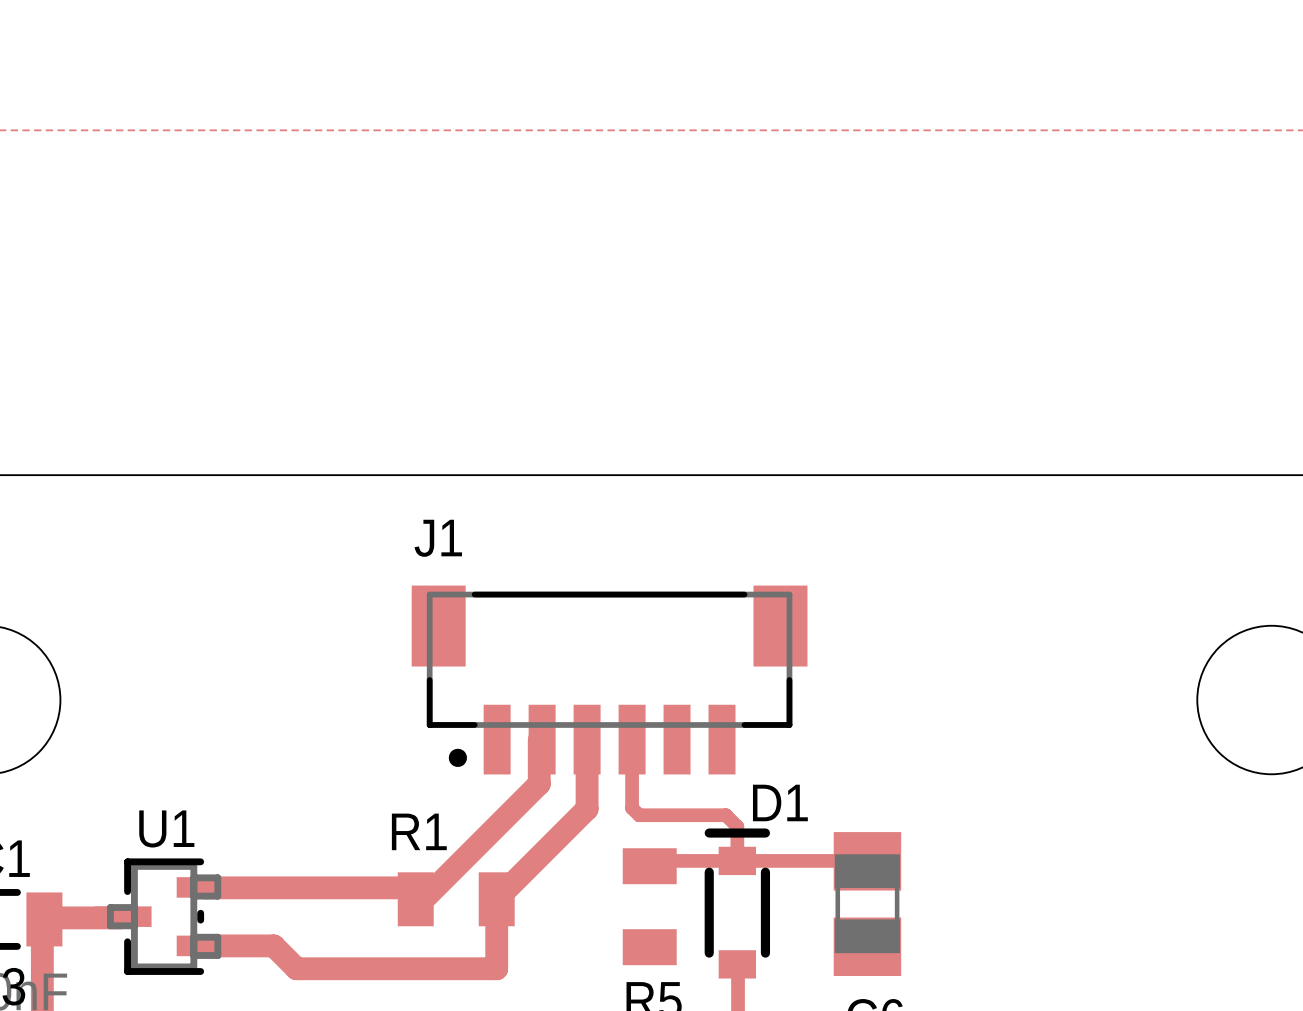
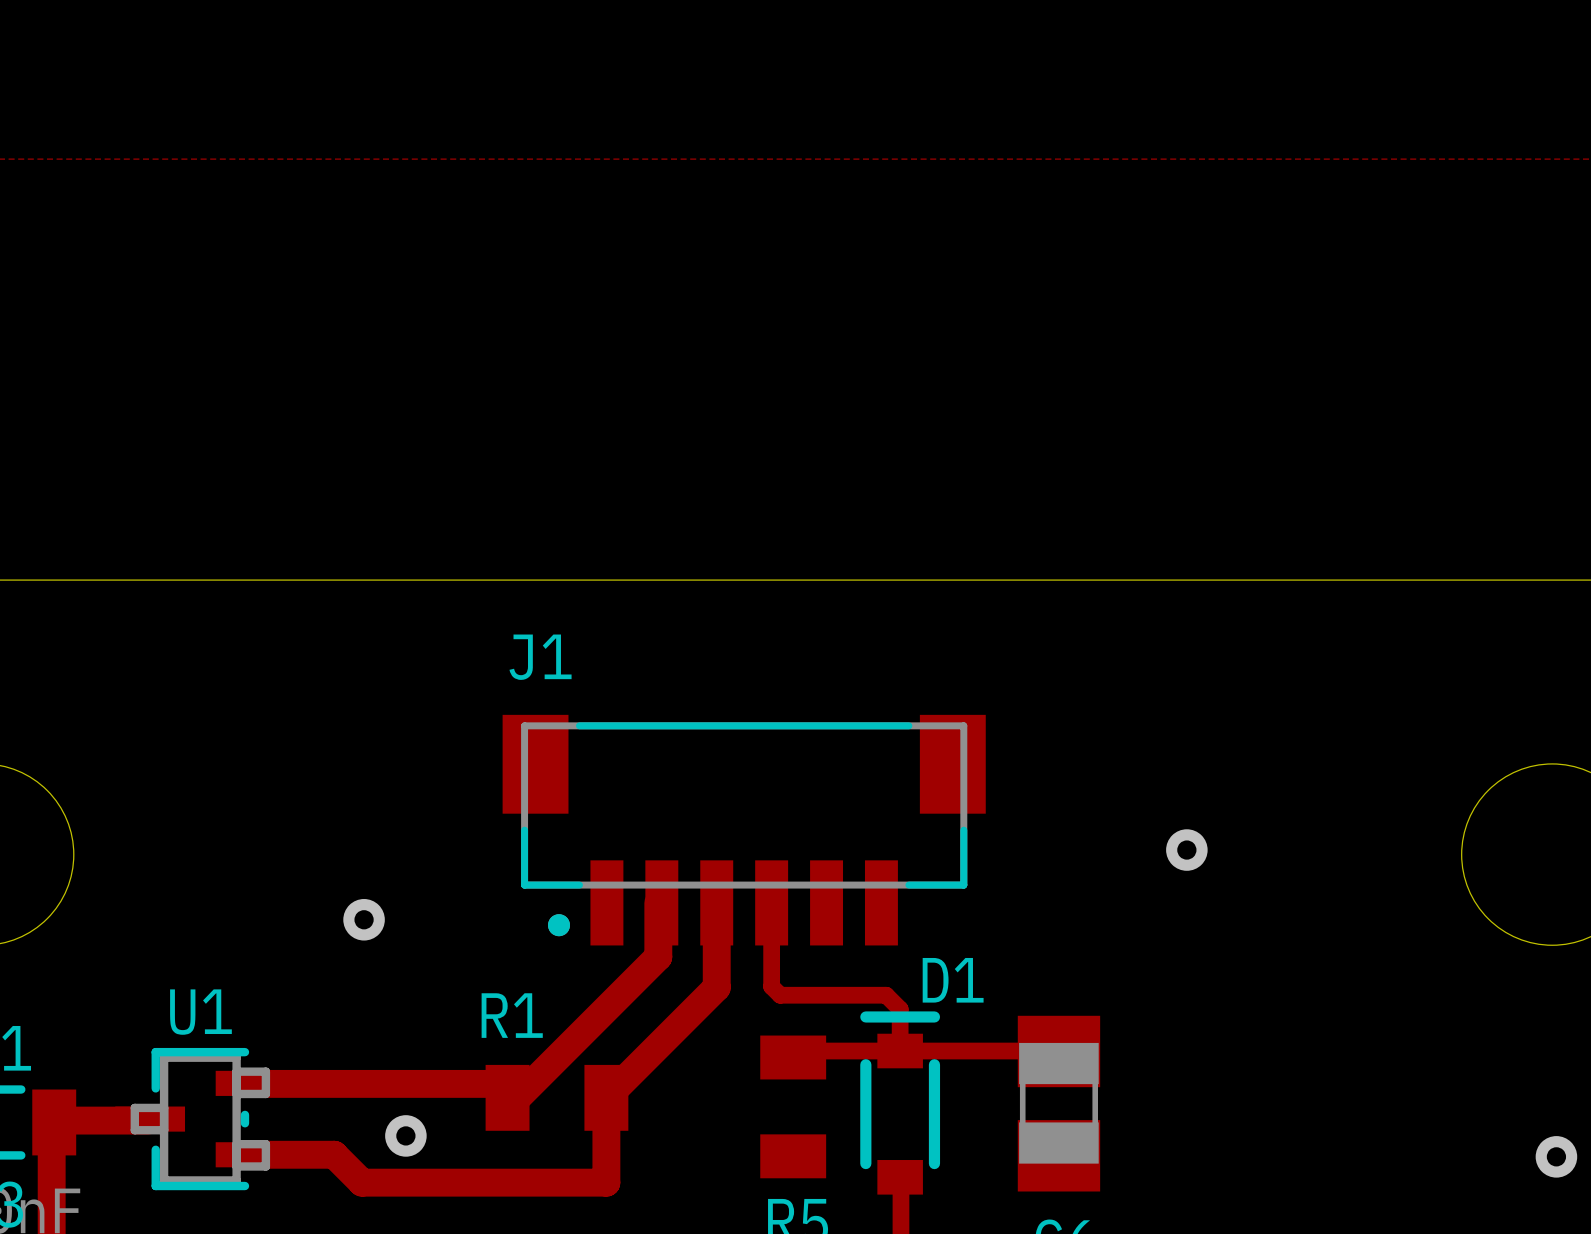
via: none -> (1186, 850)
via: none -> (364, 919)
via: none -> (405, 1135)
via: none -> (1556, 1156)

